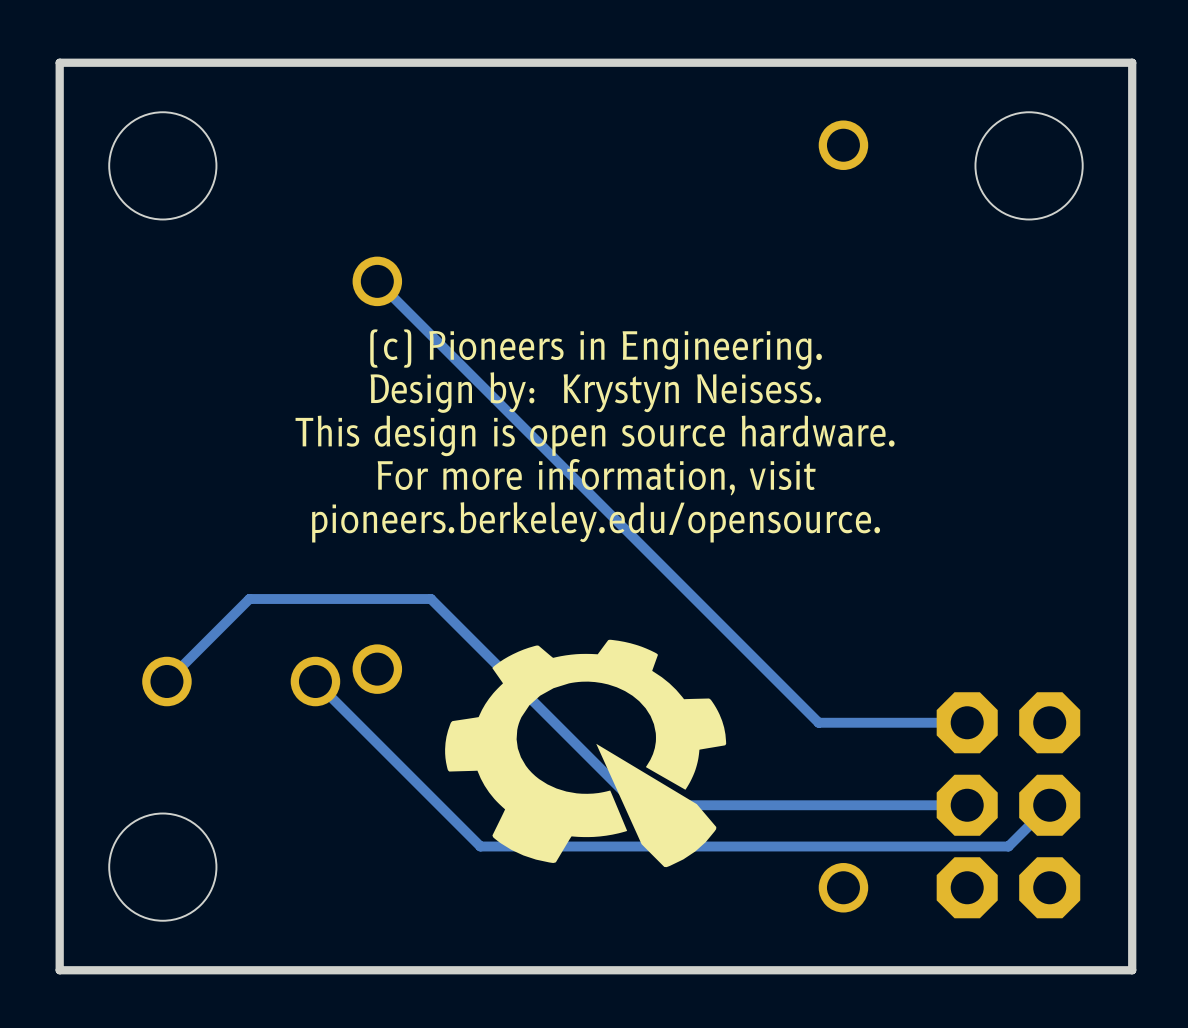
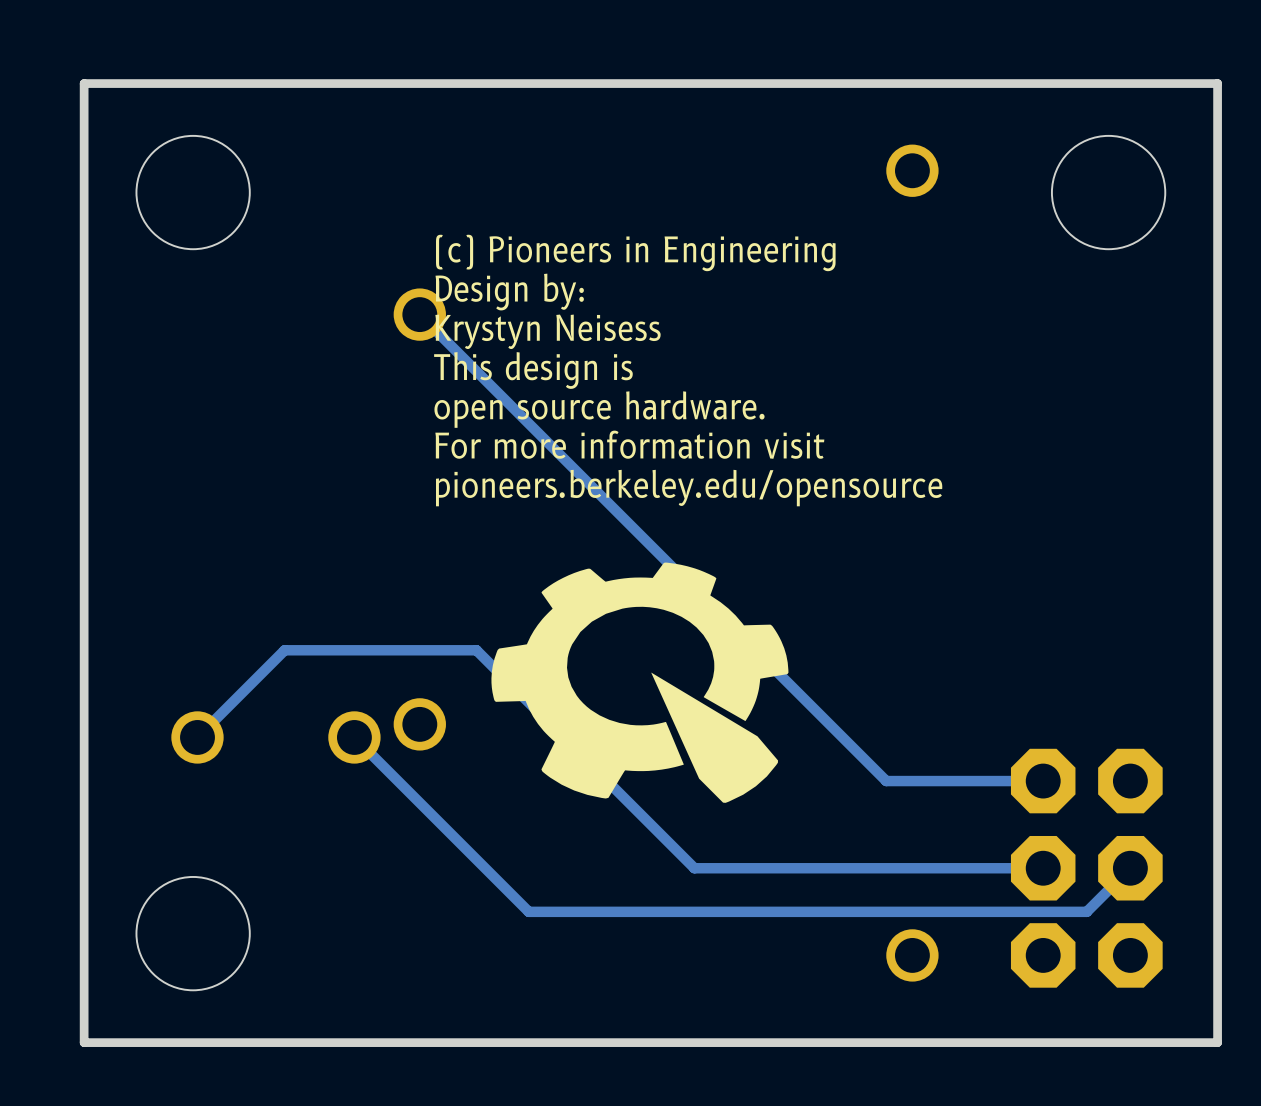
text: none -> (c) Pioneers in Engineering (635, 252)
text: none -> Design by: (509, 292)
text: none -> Krystyn Neisess (548, 331)
text: none -> This design is (533, 370)
text: (c) Pioneers in Engineering. (596, 349) -> none
text: none -> open source hardware. (599, 409)
text: Design by: Krystyn Neisess. (595, 392) -> none
text: none -> For more information visit (629, 444)
text: This design is open source hardware. (595, 435) -> none
text: none -> pioneers.berkeley.edu/opensource (689, 488)
text: For more information, visit (596, 477) -> none
text: pioneers.berkeley.edu/opensource. (596, 522) -> none
drawing position: (585, 753) -> (639, 682)

